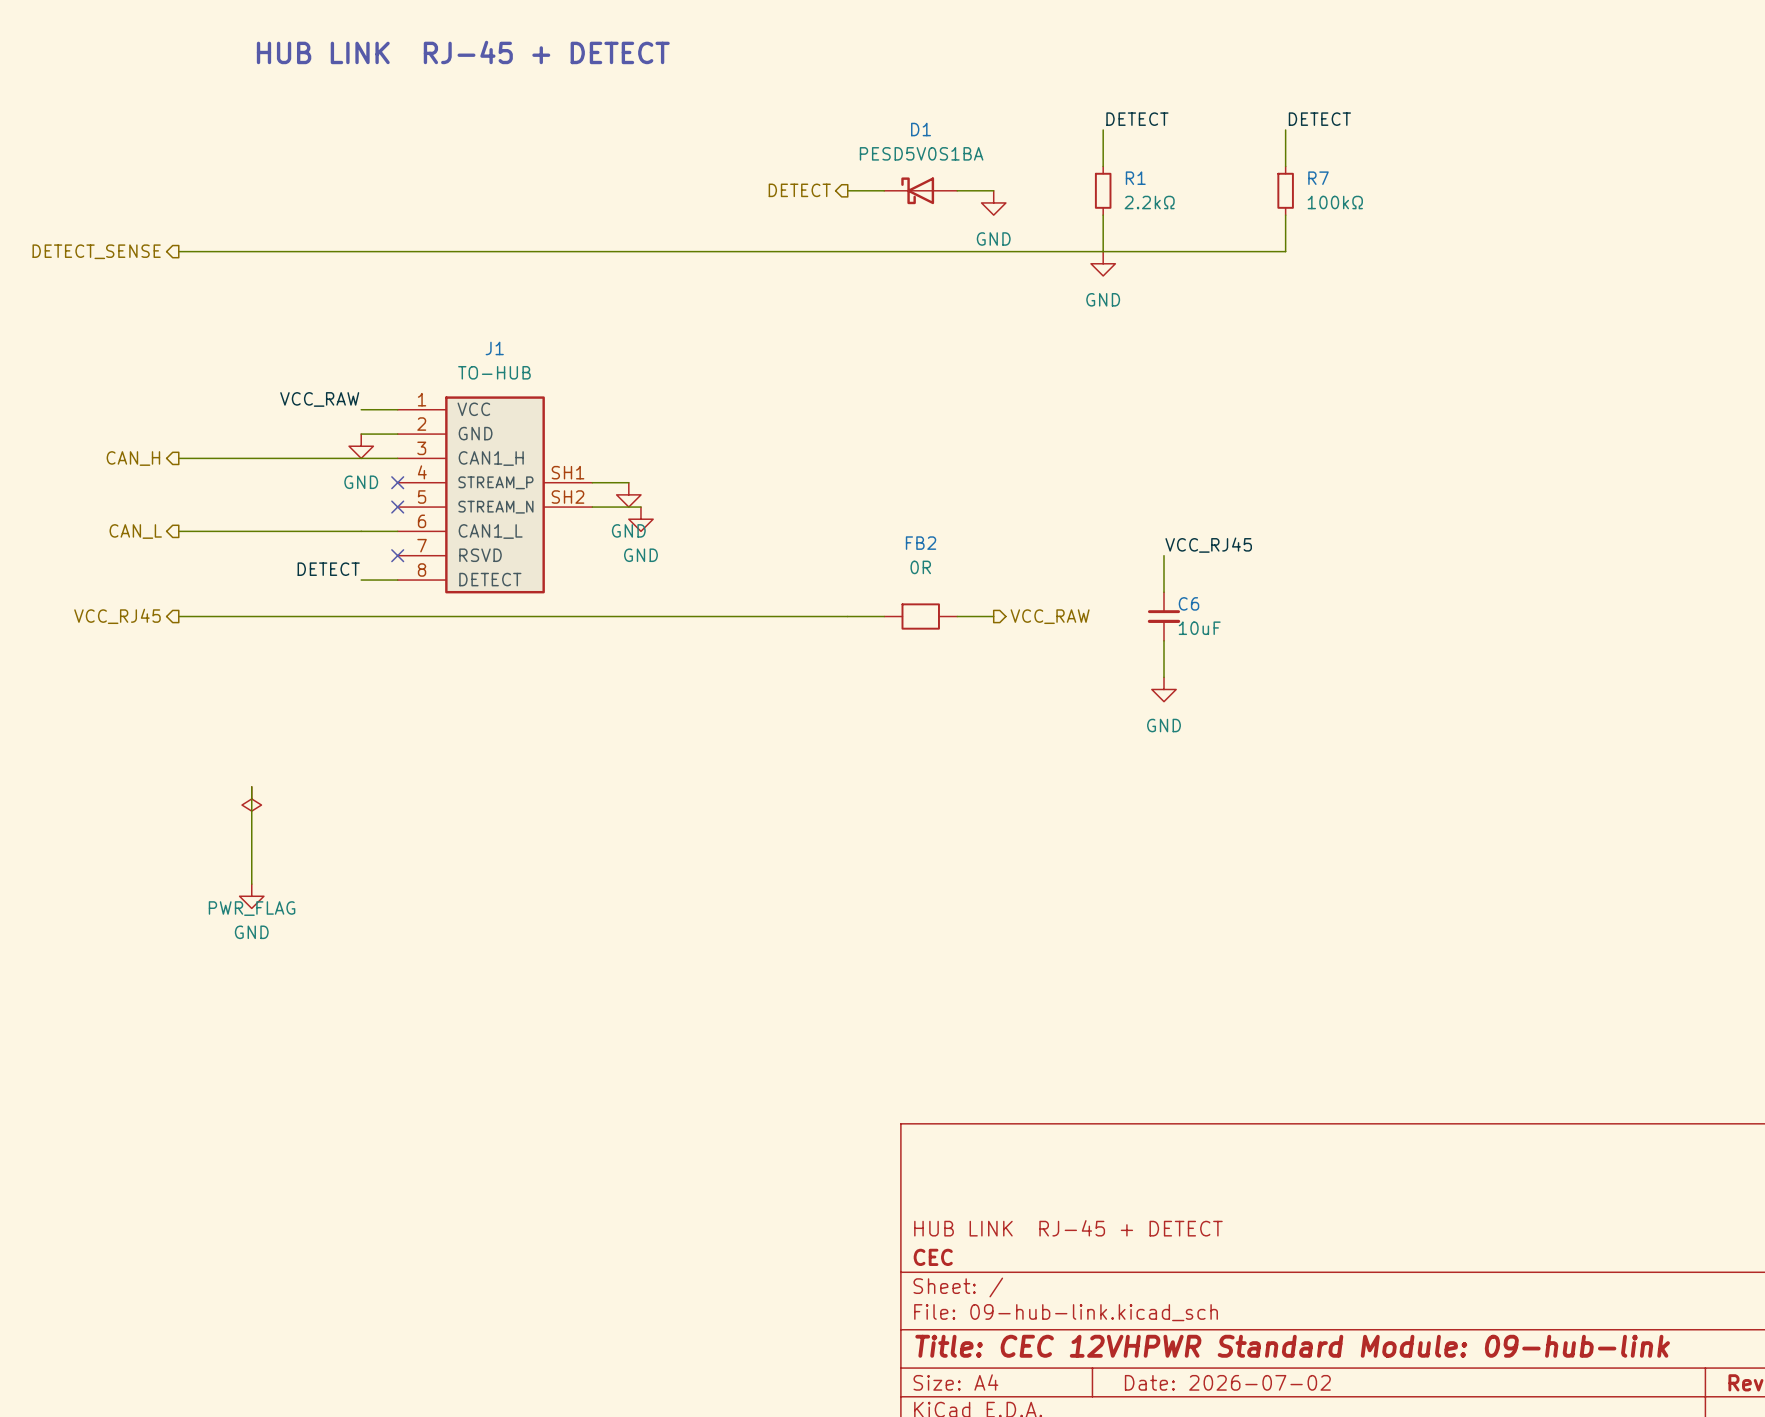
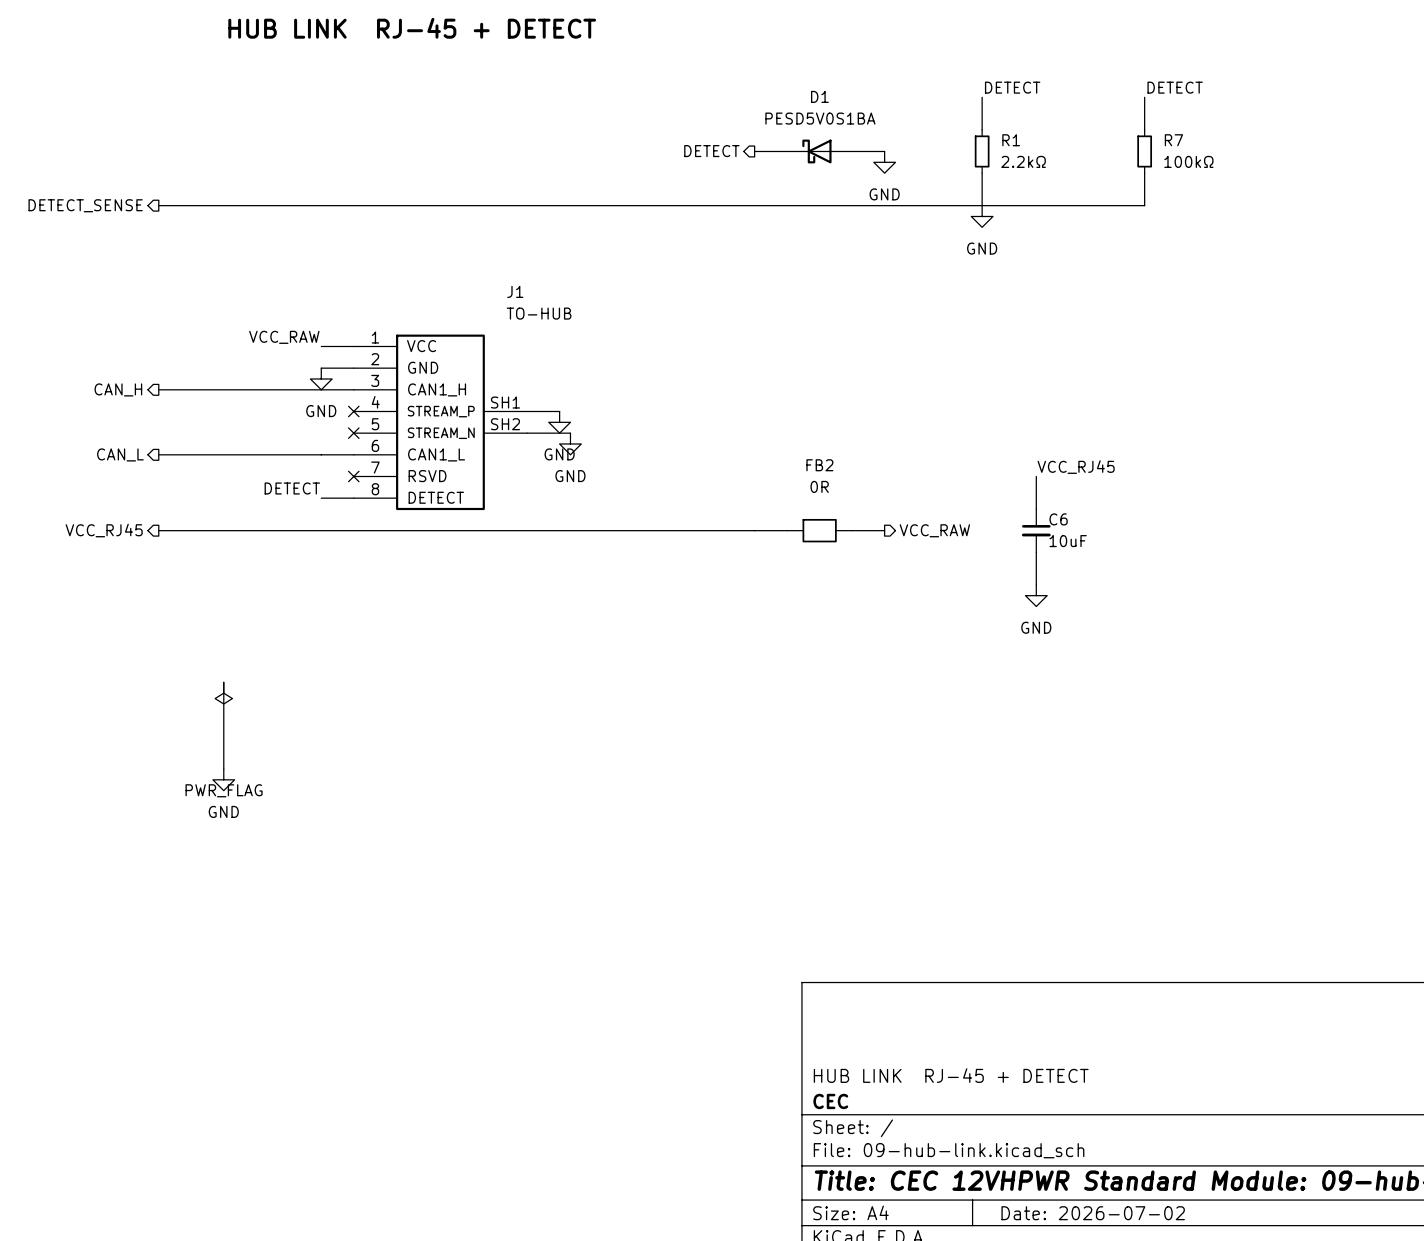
J1 name position: J1 (494, 348) -> J1 (515, 291)
J1 value position: TO-HUB (494, 372) -> TO-HUB (539, 313)

